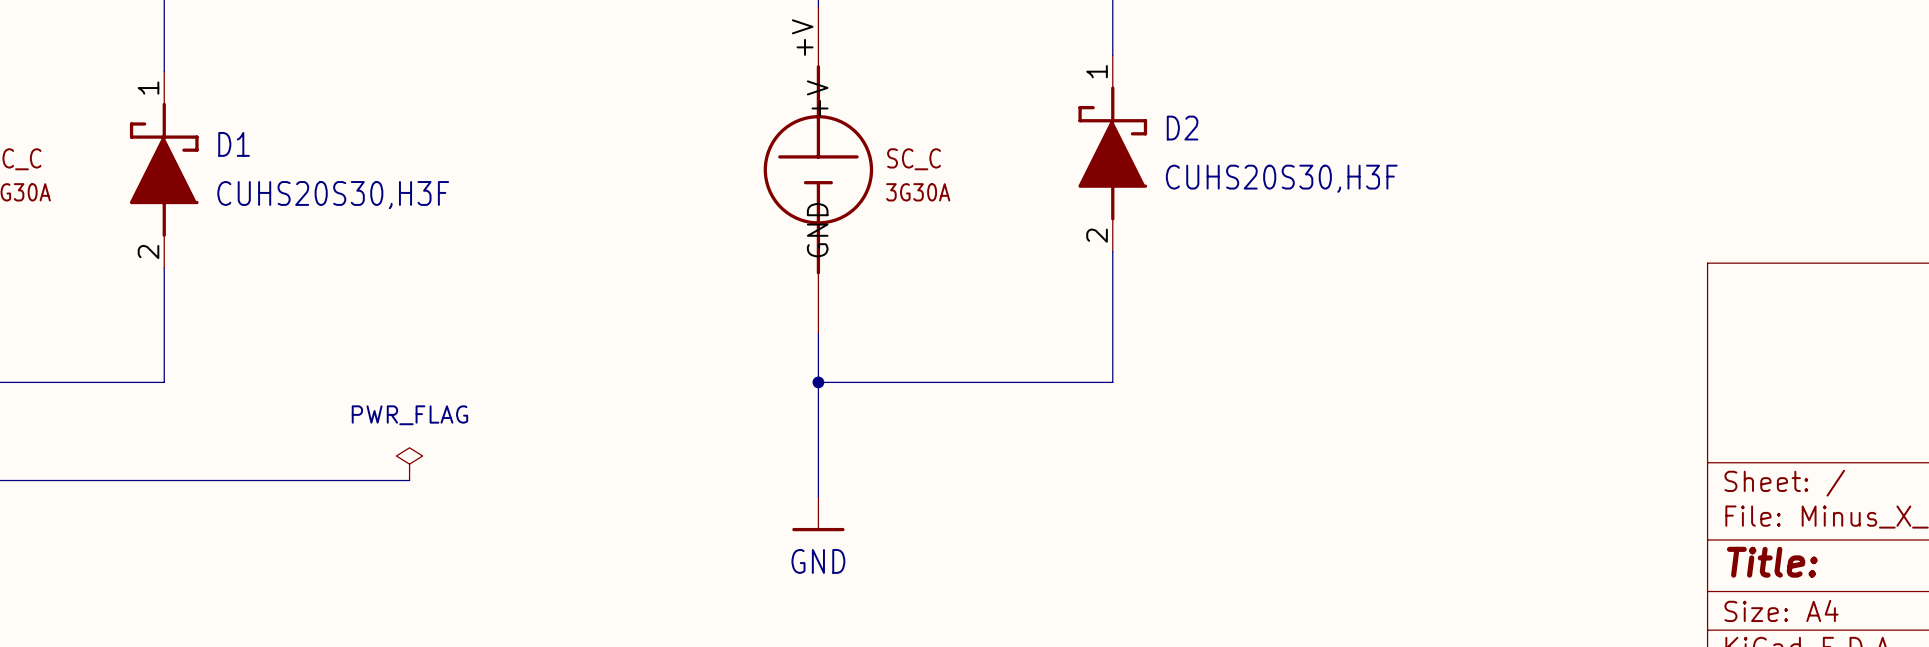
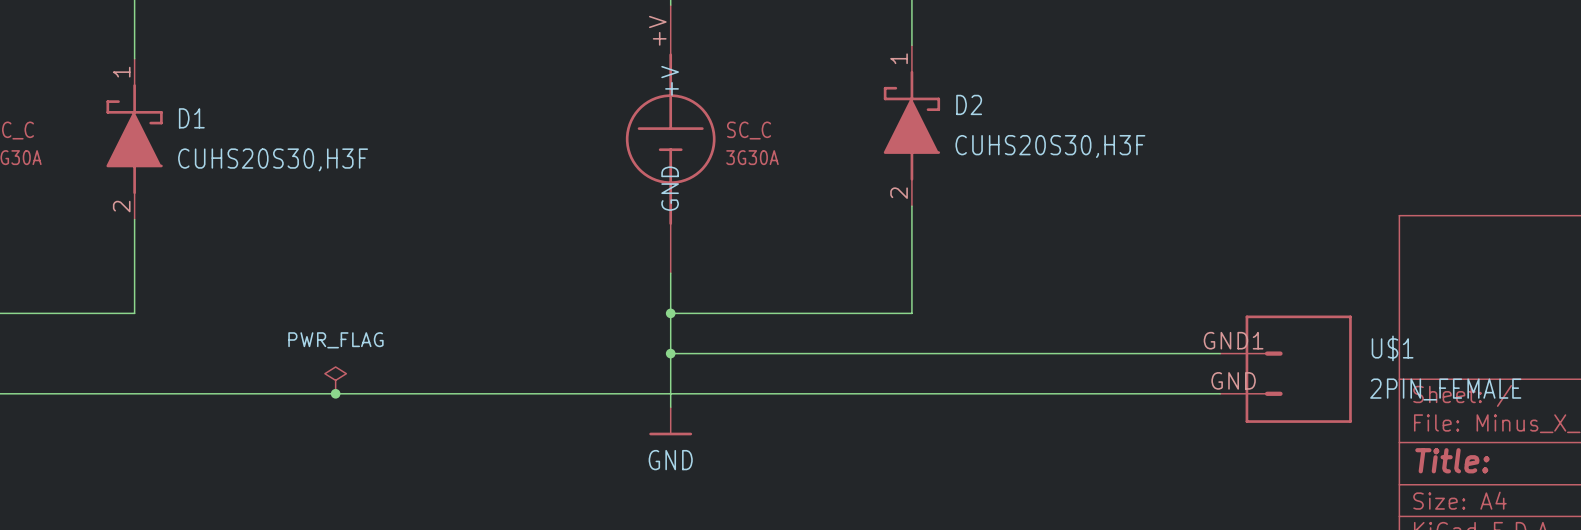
wire: none -> (670, 353) (1220, 353)
junction: none -> (670, 353)
U$1: none -> 2PIN_FEMALE (1285, 369)
wire: none -> (335, 393) (1220, 393)
junction: none -> (335, 393)

